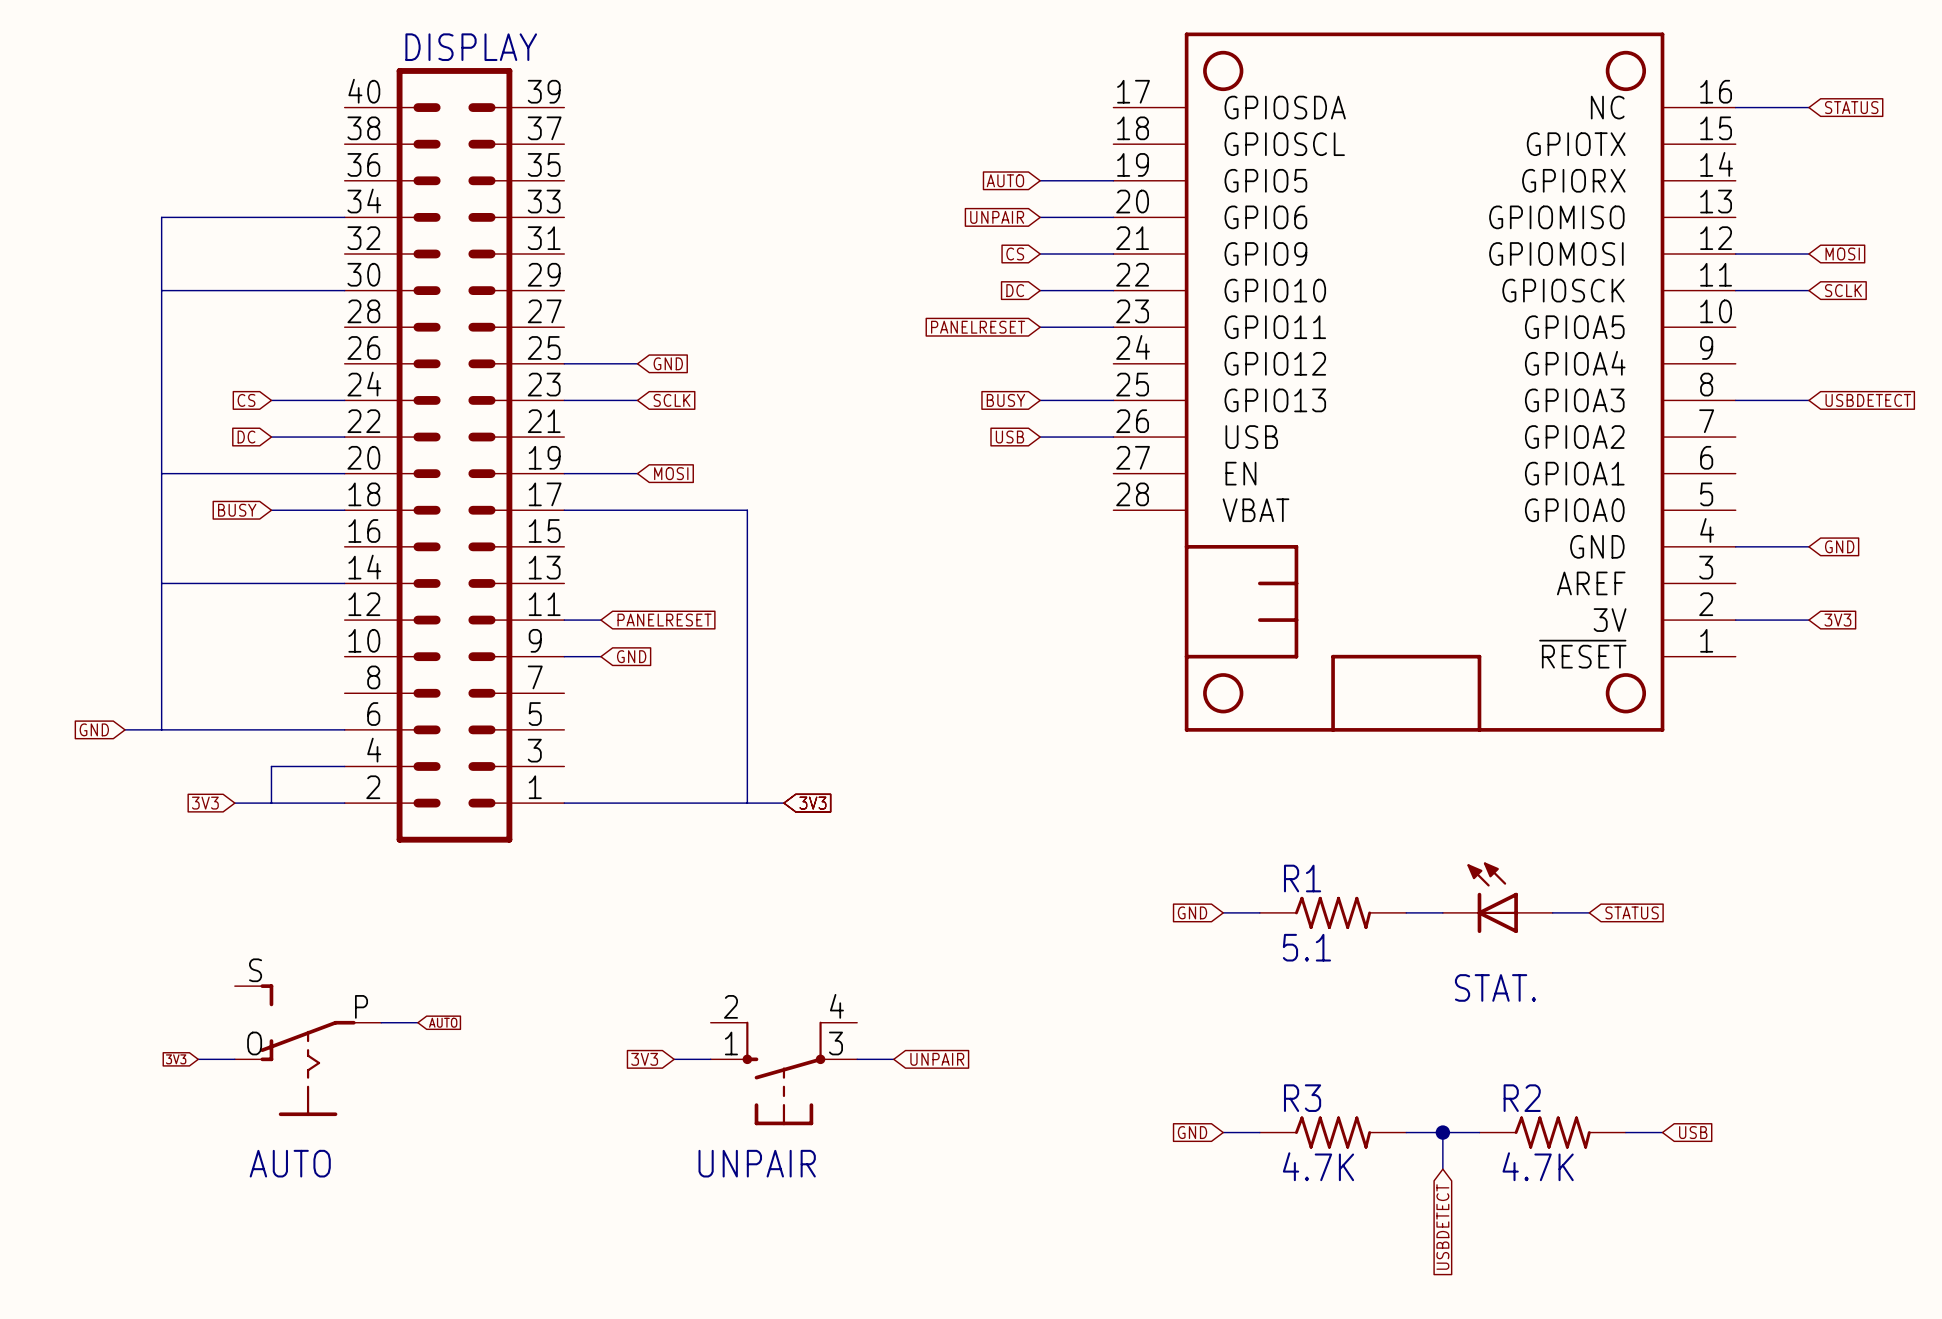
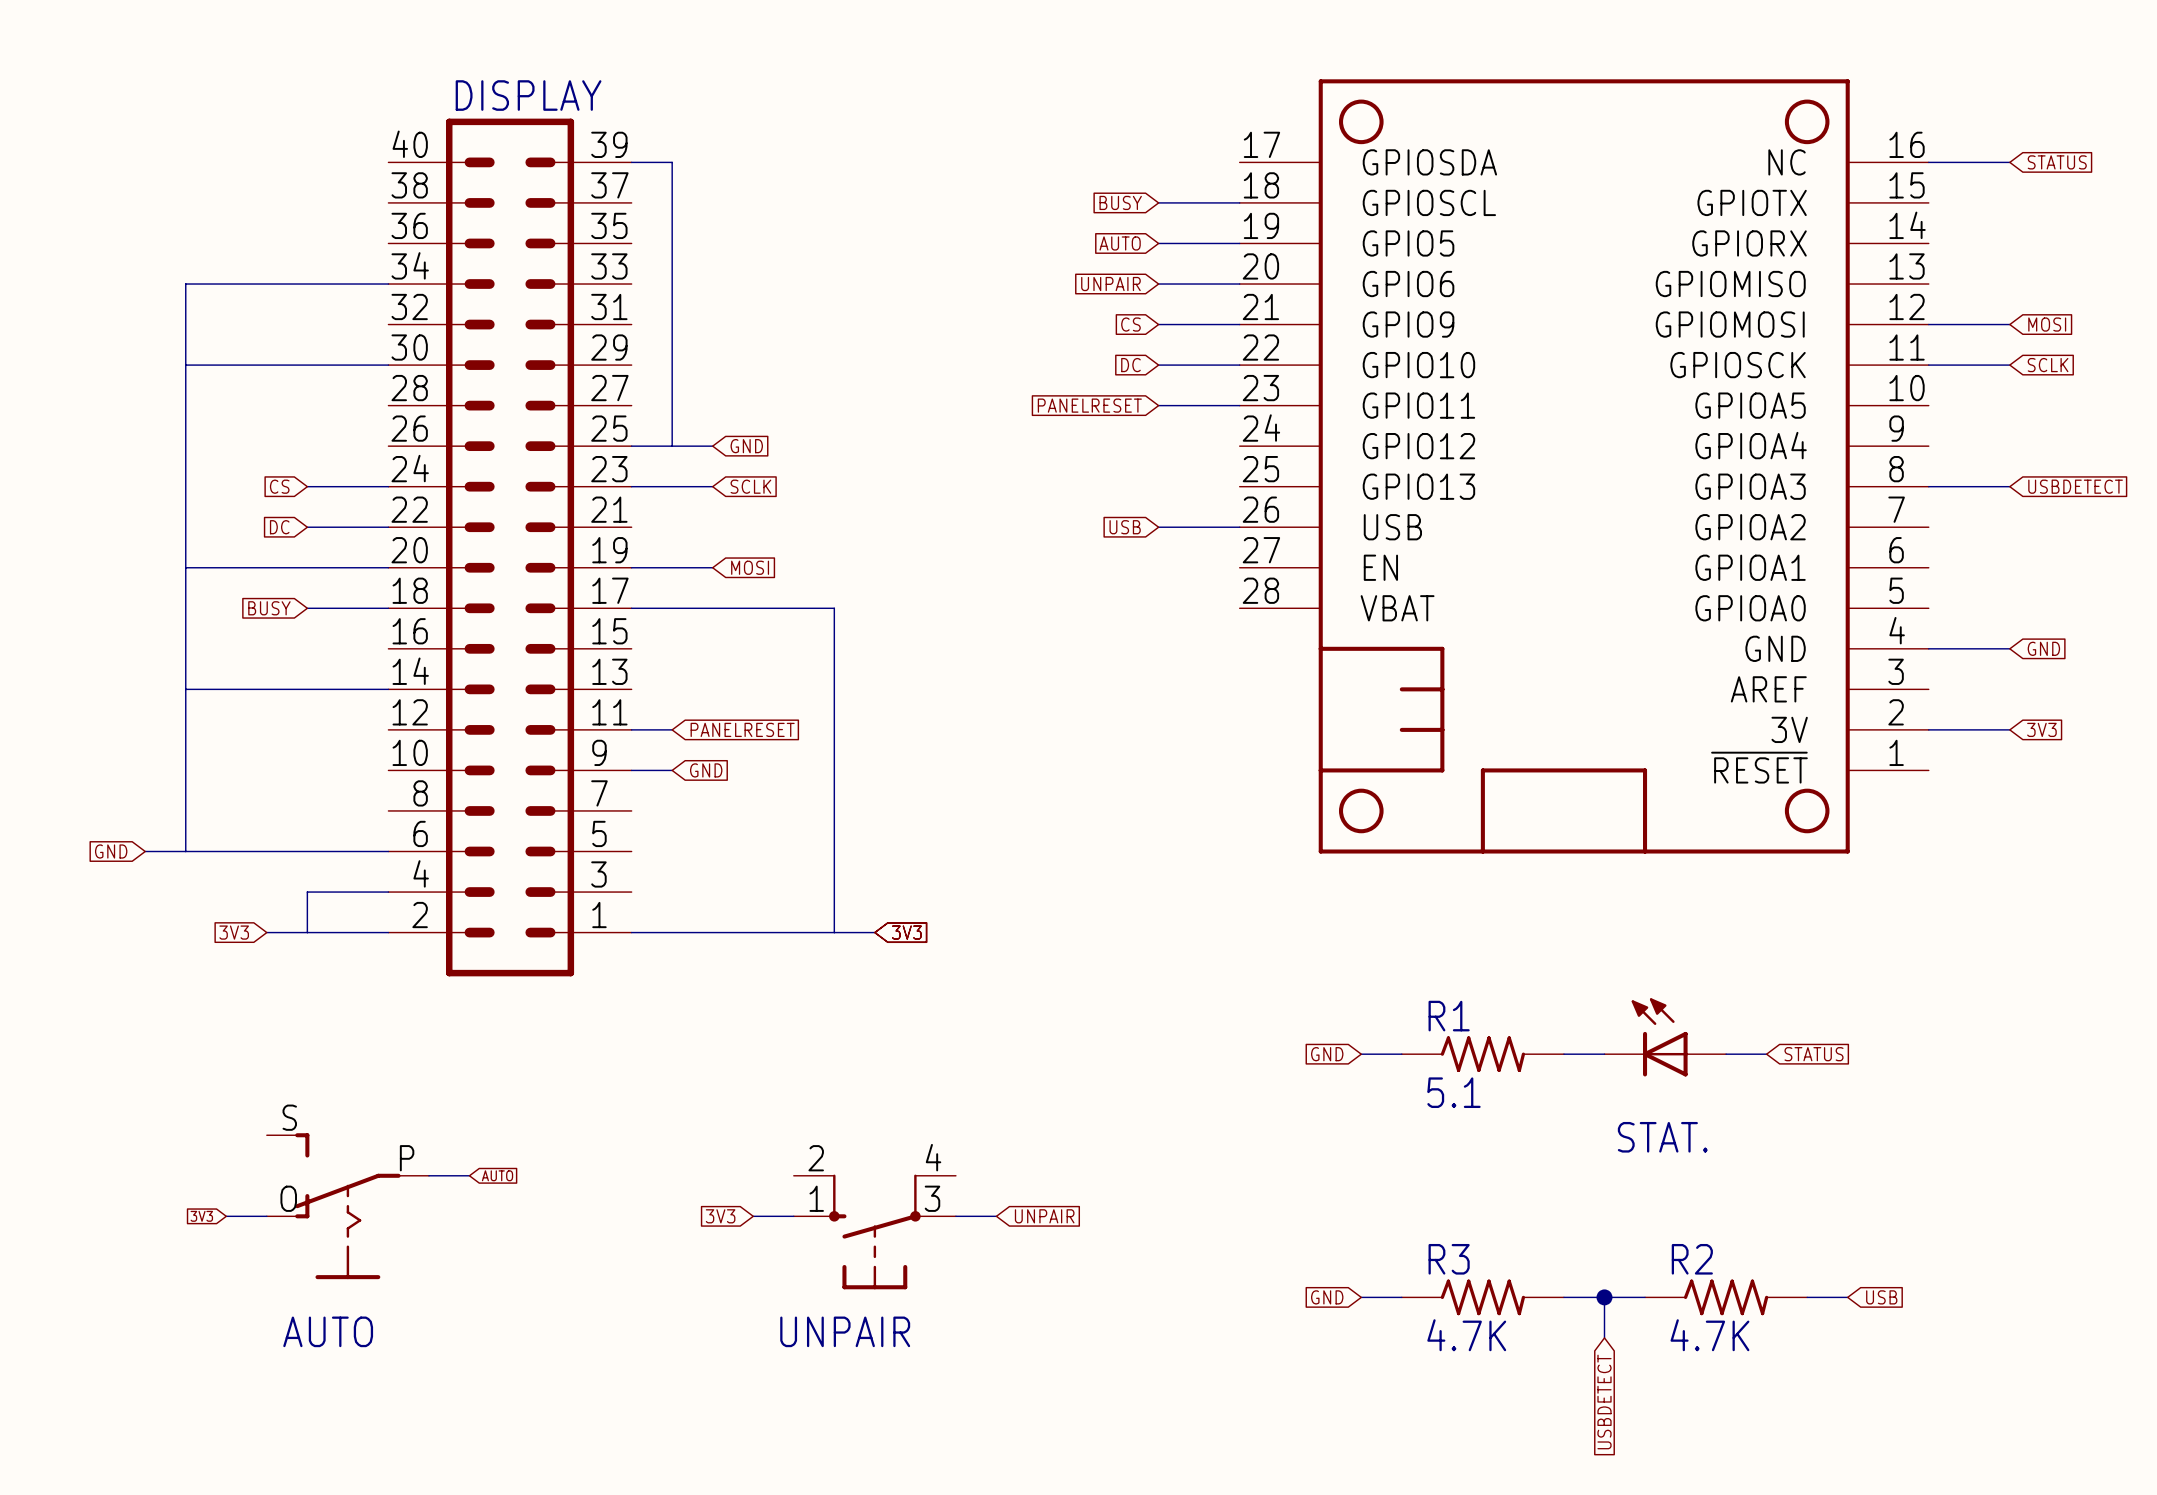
wire: none -> (631, 162) (672, 162) (672, 446)
global label position: BUSY (1005, 400) -> BUSY (1120, 202)
wire: (1040, 400) (1113, 400) -> (1158, 202) (1239, 202)

